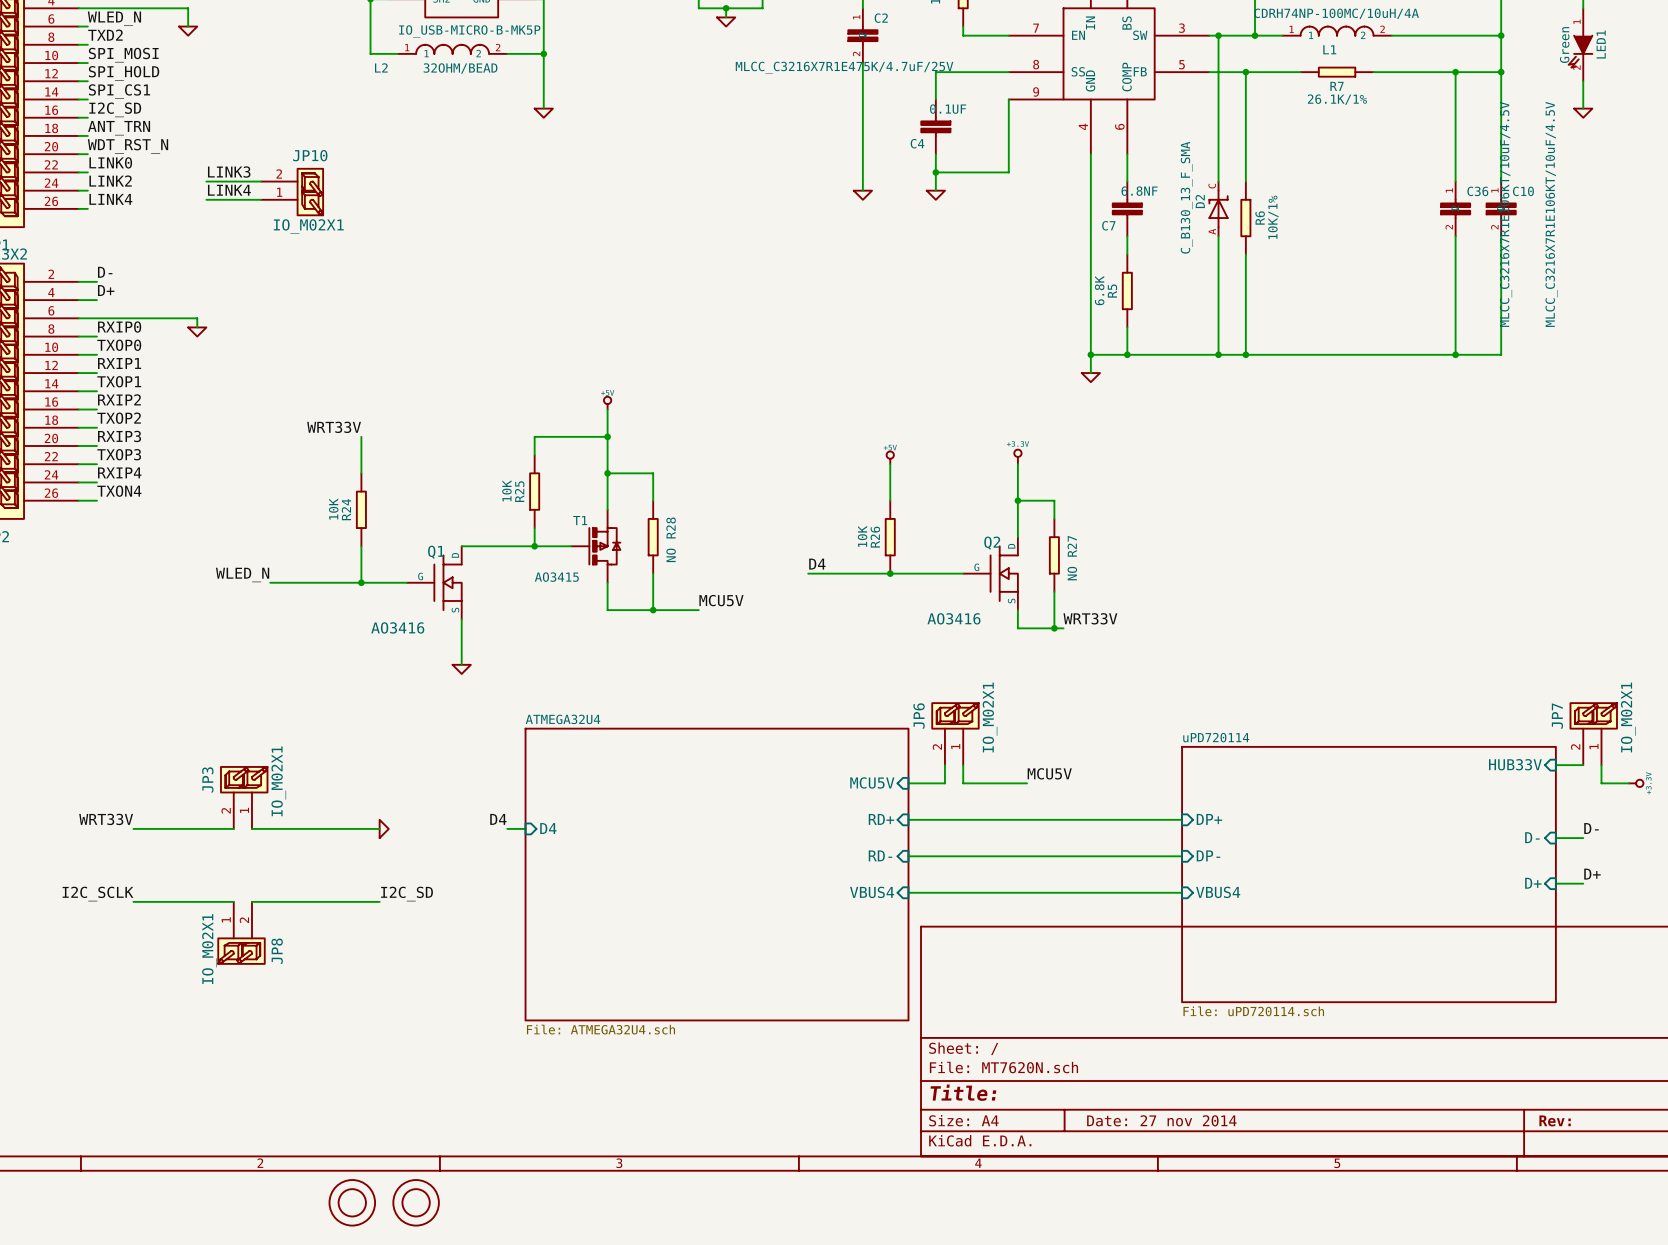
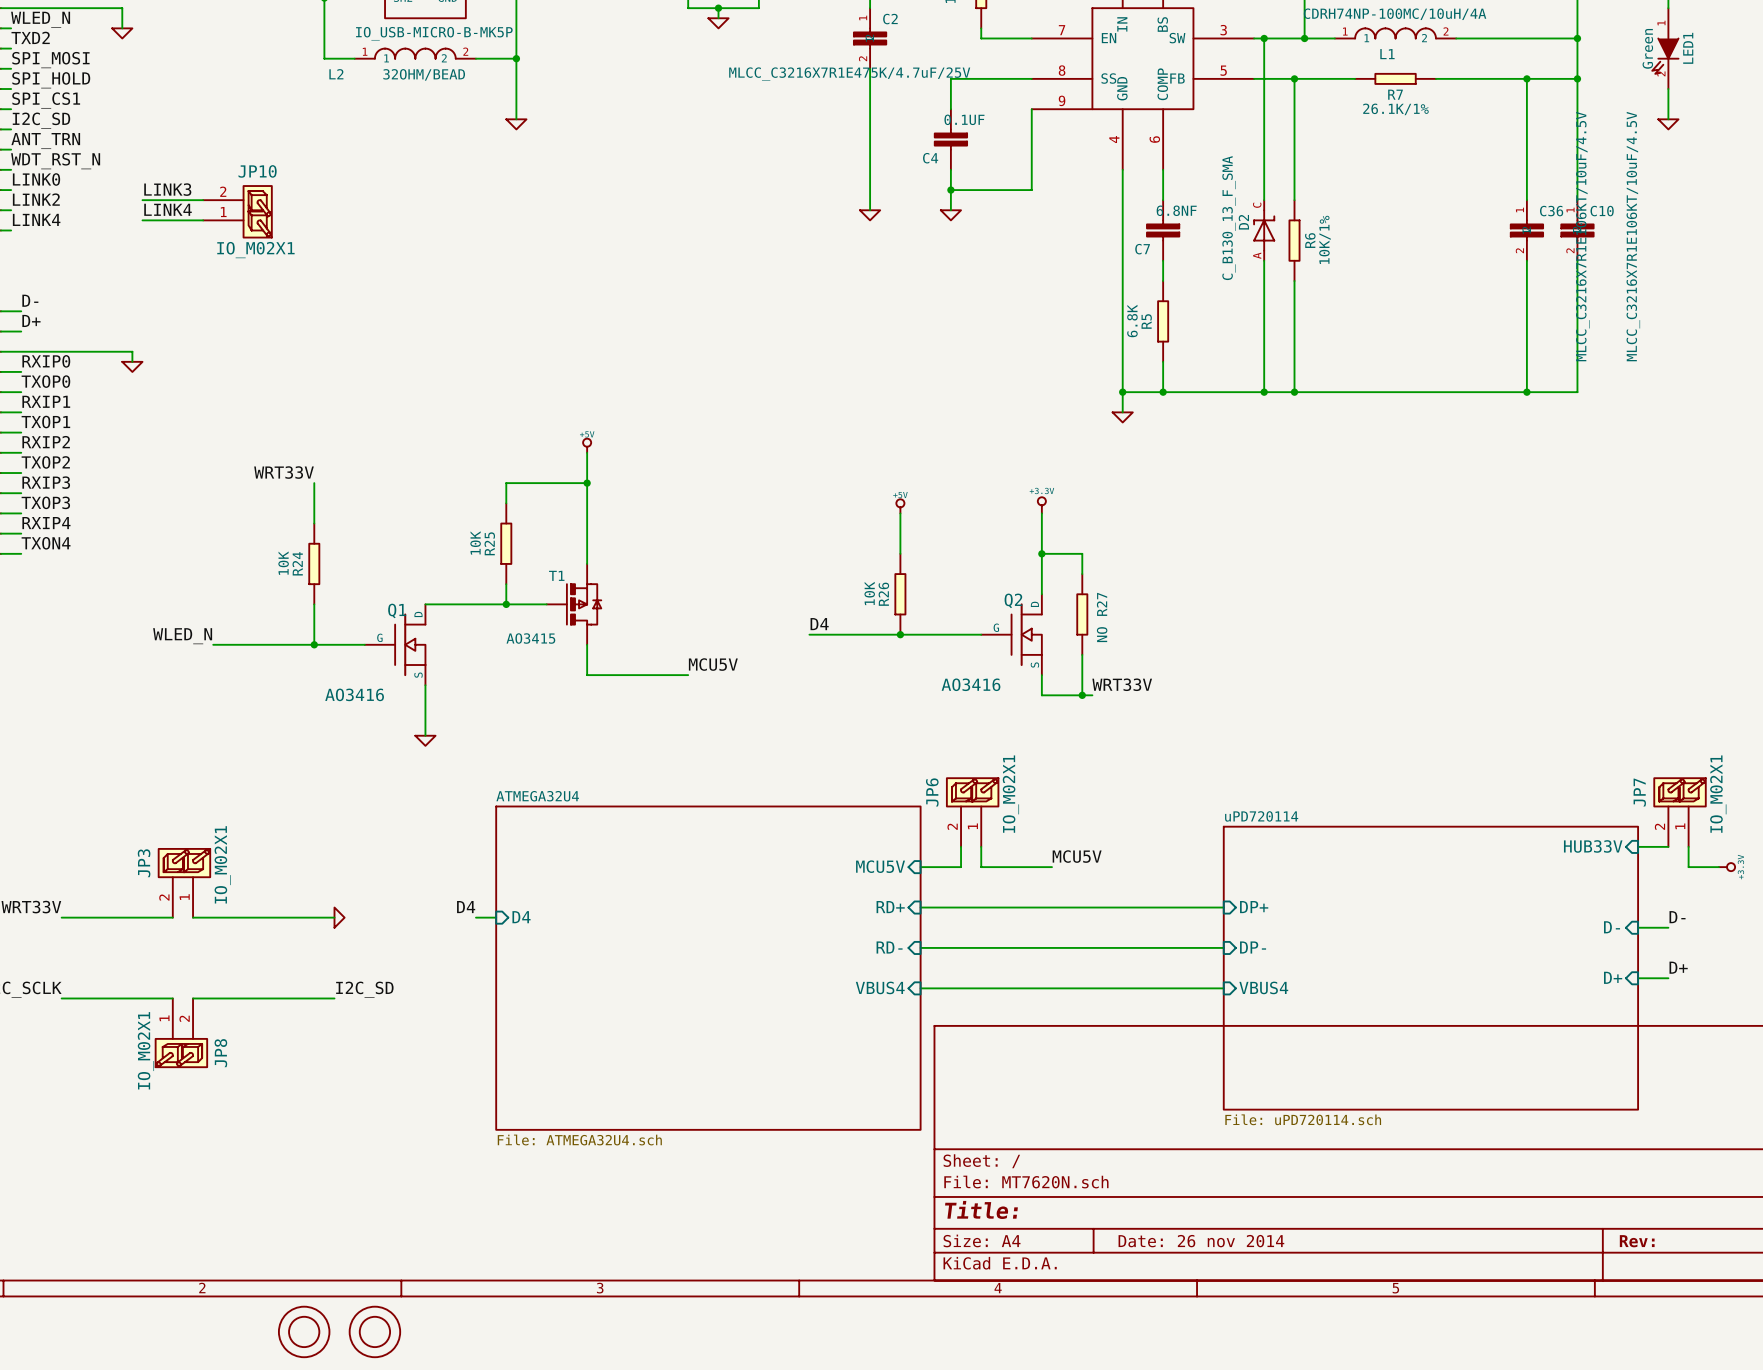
wire: (607, 473) (653, 473) (653, 500) -> none
junction: (607, 473) -> none
R28: NO (653, 537) -> none
wire: (653, 573) (653, 610) -> none
junction: (653, 610) -> none
title block: Date: 27 nov 2014 (1161, 1120) -> Date: 26 nov 2014 (1201, 1241)

